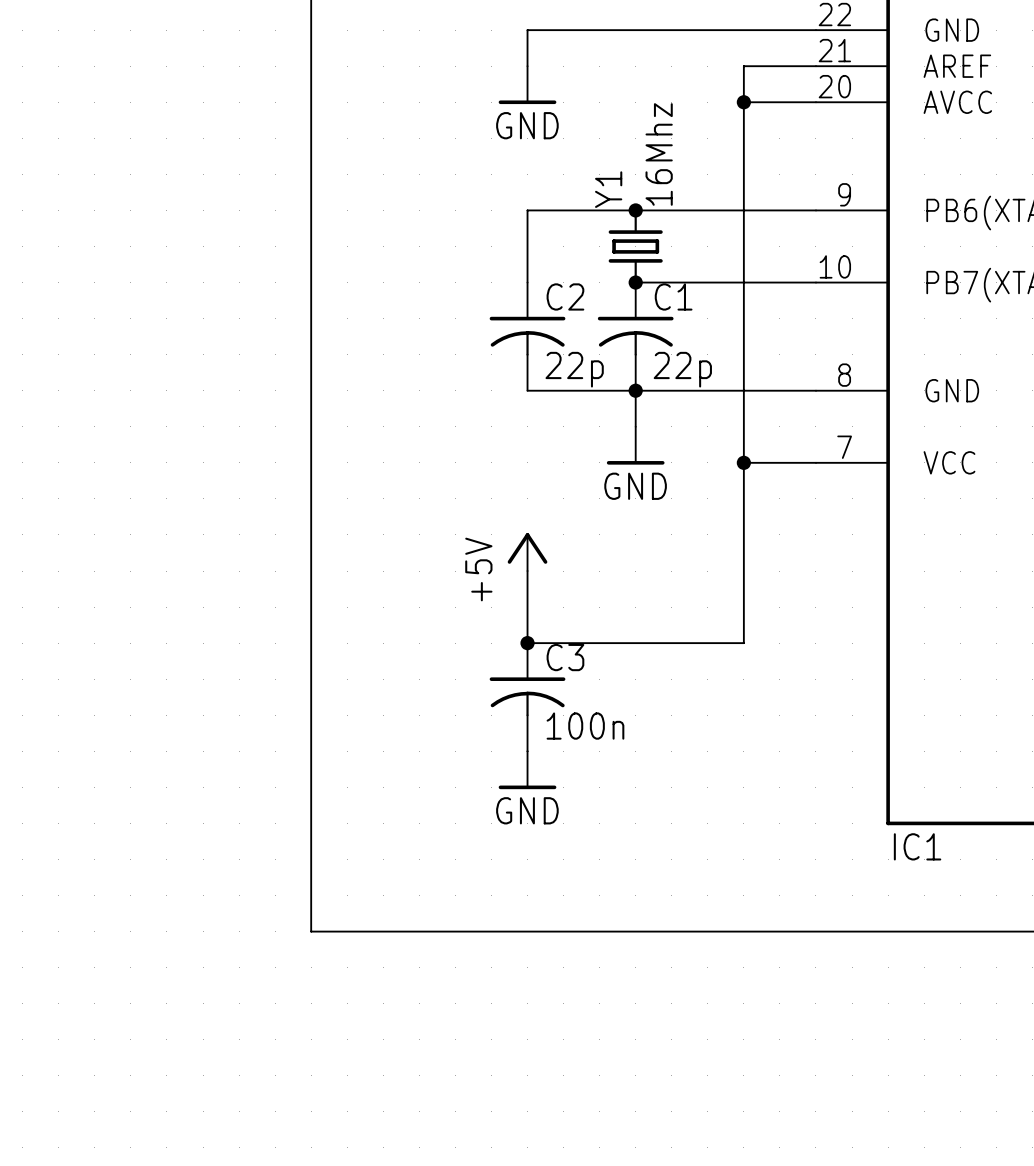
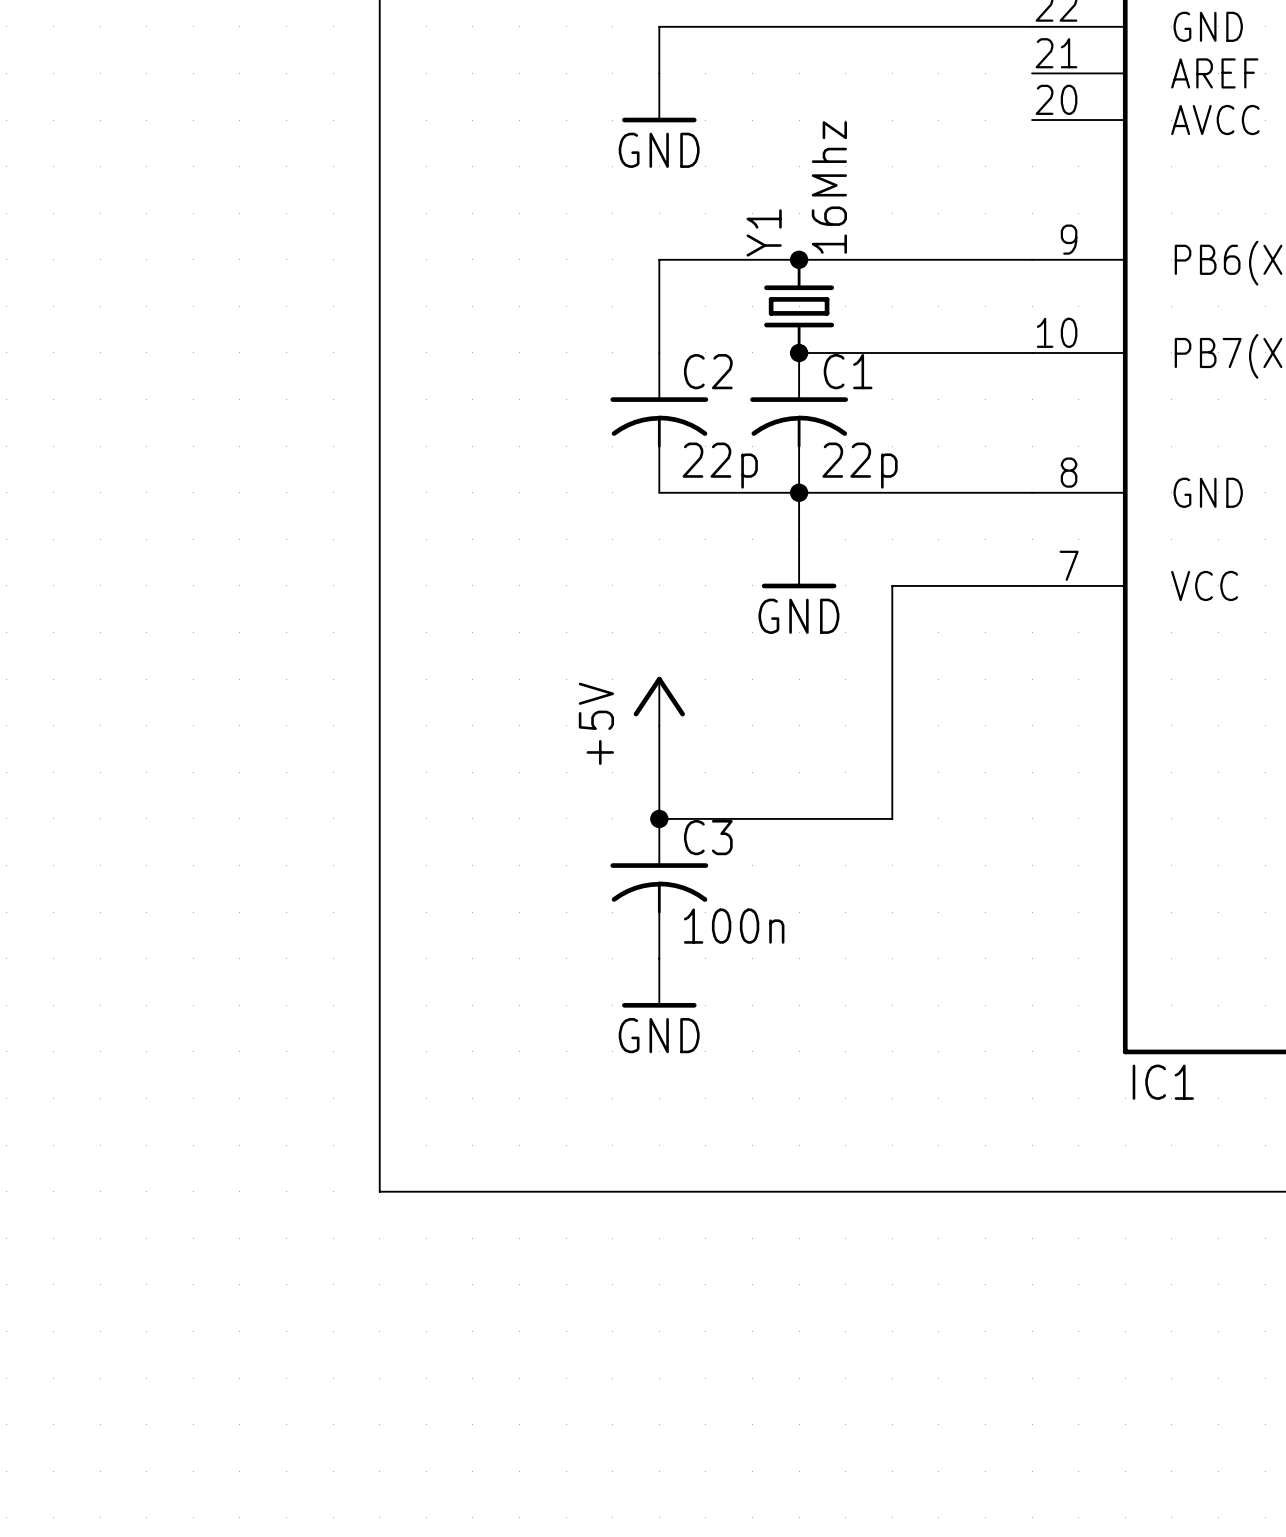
wire: (815, 66) (743, 66) (743, 643) (707, 643) -> (938, 585) (892, 585) (892, 818)
wire: (743, 102) (815, 102) -> none
junction: (743, 102) -> none
junction: (743, 462) -> none

